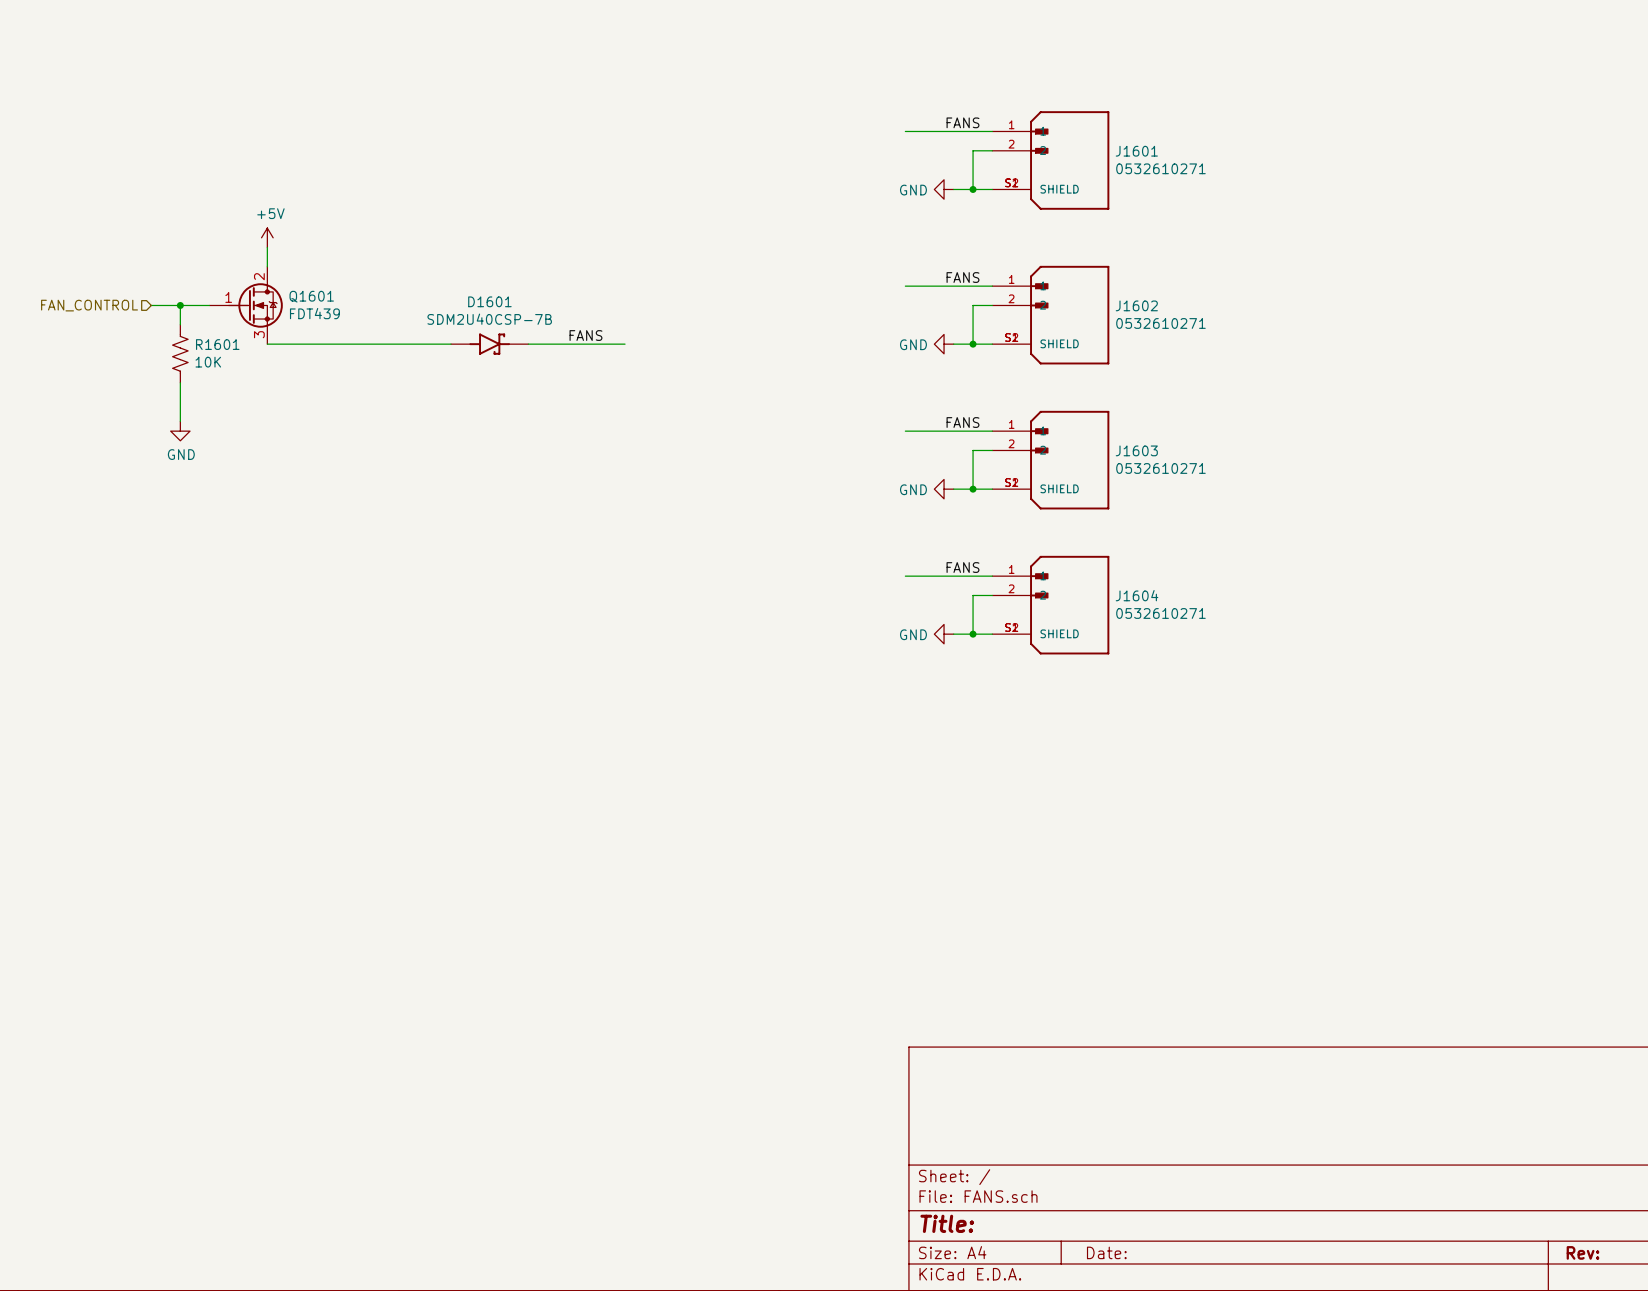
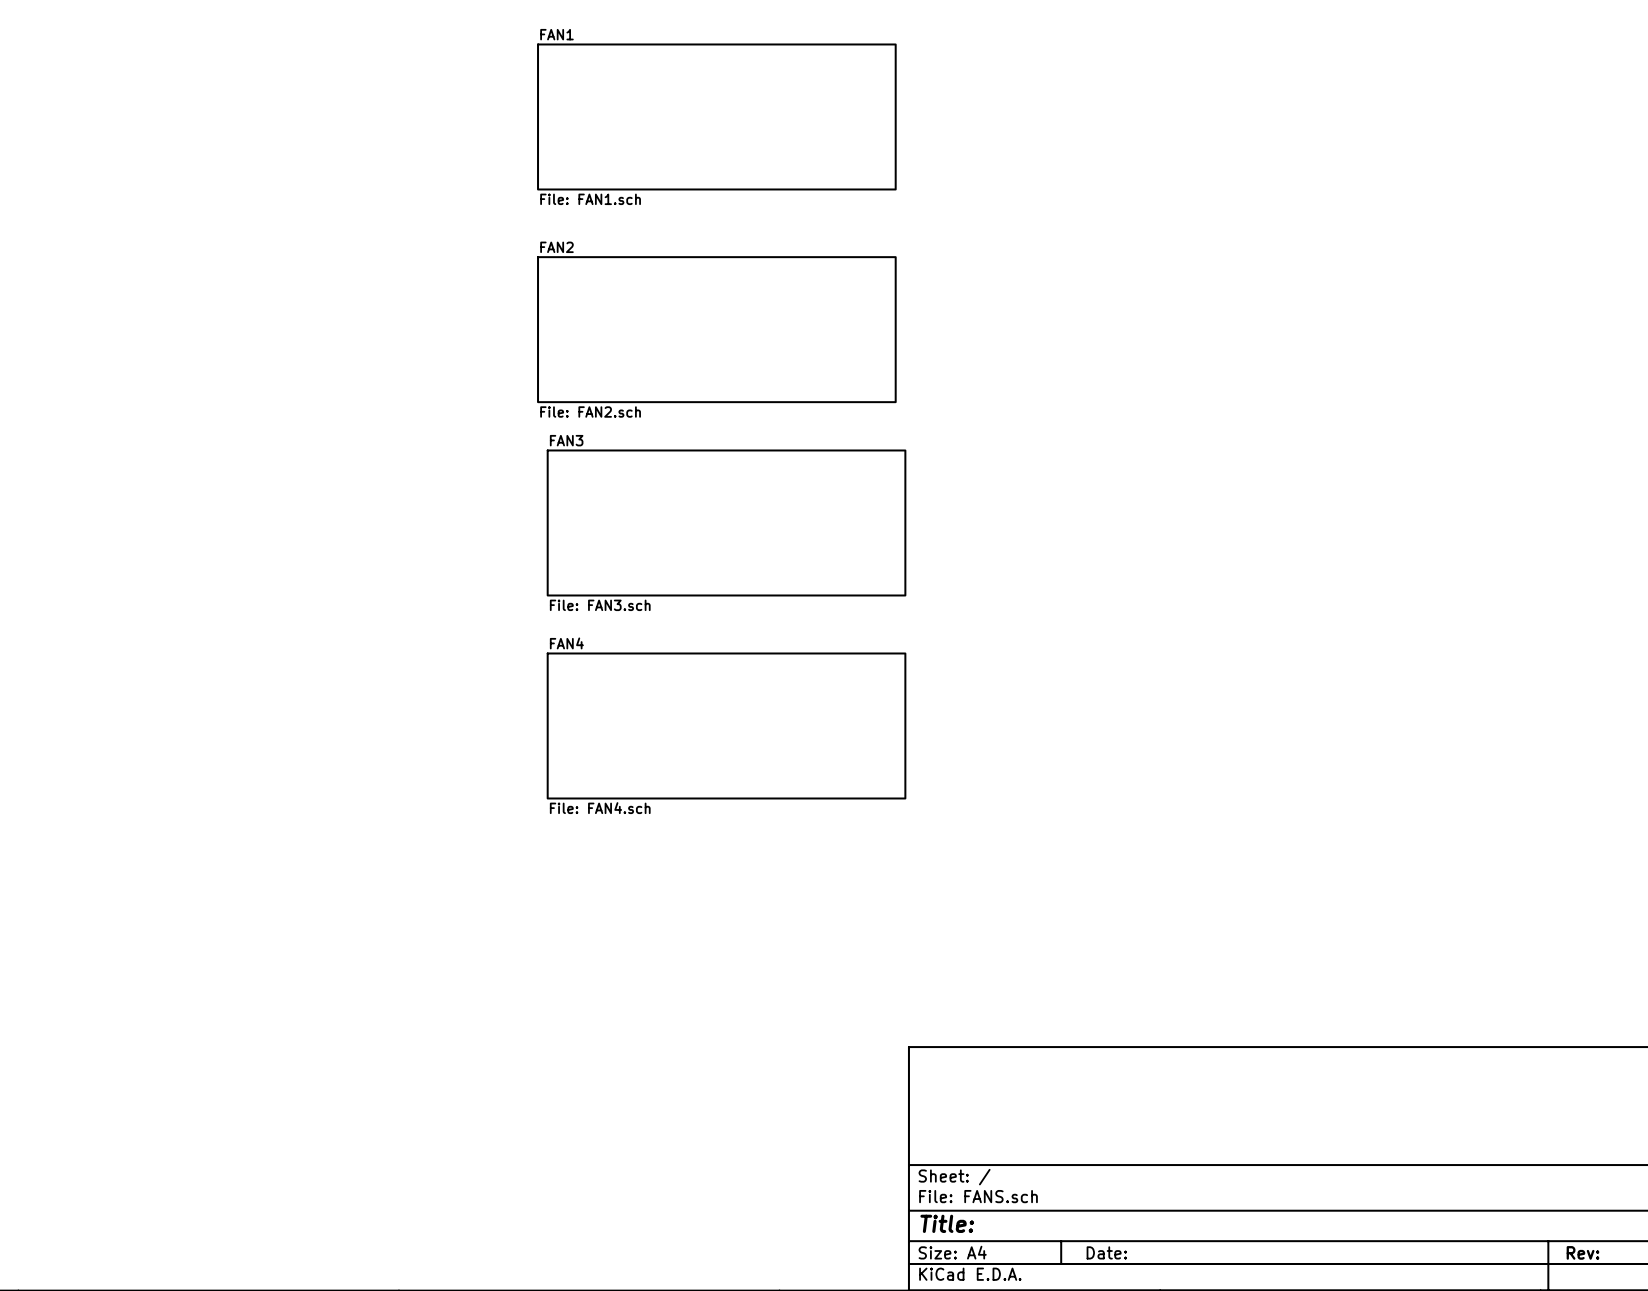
sheet FAN1: none -> File: FAN1.sch (716, 116)
label: FANS (962, 122) -> none
wire: (905, 131) (992, 131) -> none
wire: (992, 150) (973, 150) (973, 189) -> none
J1601: 0532610271 (1050, 160) -> none
power symbol: GND (944, 189) -> none
wire: (953, 189) (992, 189) -> none
junction: (973, 189) -> none
power symbol: +5V (267, 237) -> none
wire: (267, 247) (267, 266) -> none
label: FANS (962, 277) -> none
wire: (905, 286) (992, 286) -> none
hierarchical label: FAN_CONTROL (89, 305) -> none
wire: (151, 305) (209, 305) -> none
wire: (180, 305) (180, 324) -> none
junction: (180, 305) -> none
Q1601: FDT439 (246, 305) -> none
wire: (992, 305) (973, 305) (973, 344) -> none
J1602: 0532610271 (1050, 315) -> none
sheet FAN2: none -> File: FAN2.sch (716, 329)
label: FANS (585, 335) -> none
wire: (267, 344) (451, 344) -> none
D1601: SDM2U40CSP-7B (489, 344) -> none
wire: (528, 344) (625, 344) -> none
power symbol: GND (944, 344) -> none
wire: (953, 344) (992, 344) -> none
junction: (973, 344) -> none
R1601: 10K (180, 353) -> none
wire: (180, 382) (180, 421) -> none
label: FANS (962, 422) -> none
power symbol: GND (180, 431) -> none
wire: (905, 431) (992, 431) -> none
wire: (992, 450) (973, 450) (973, 489) -> none
J1603: 0532610271 (1050, 460) -> none
power symbol: GND (944, 489) -> none
wire: (953, 489) (992, 489) -> none
junction: (973, 489) -> none
sheet FAN3: none -> File: FAN3.sch (726, 522)
label: FANS (962, 567) -> none
wire: (905, 576) (992, 576) -> none
wire: (992, 595) (973, 595) (973, 634) -> none
J1604: 0532610271 (1050, 605) -> none
power symbol: GND (944, 634) -> none
wire: (953, 634) (992, 634) -> none
junction: (973, 634) -> none
sheet FAN4: none -> File: FAN4.sch (726, 725)

